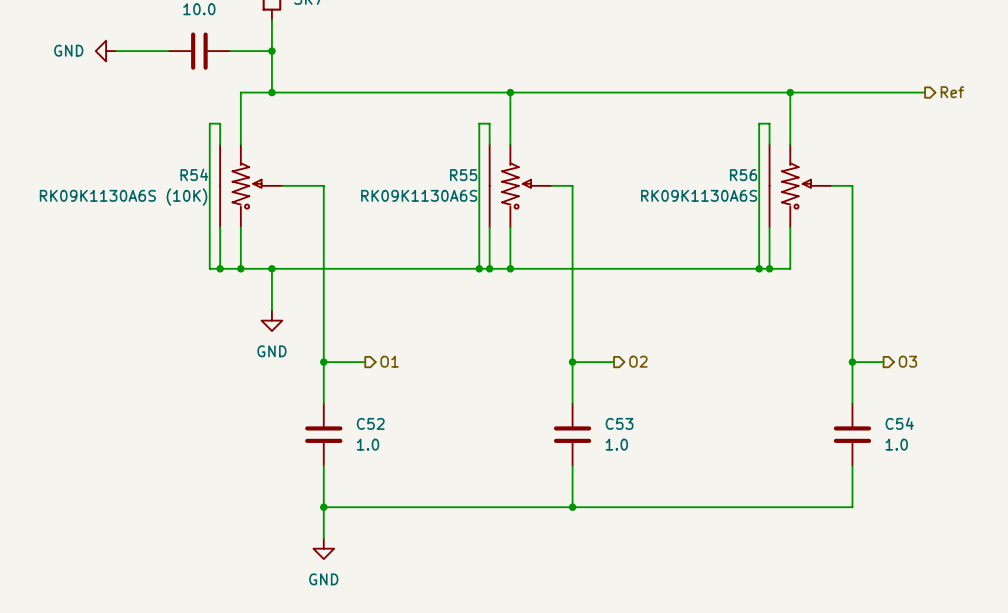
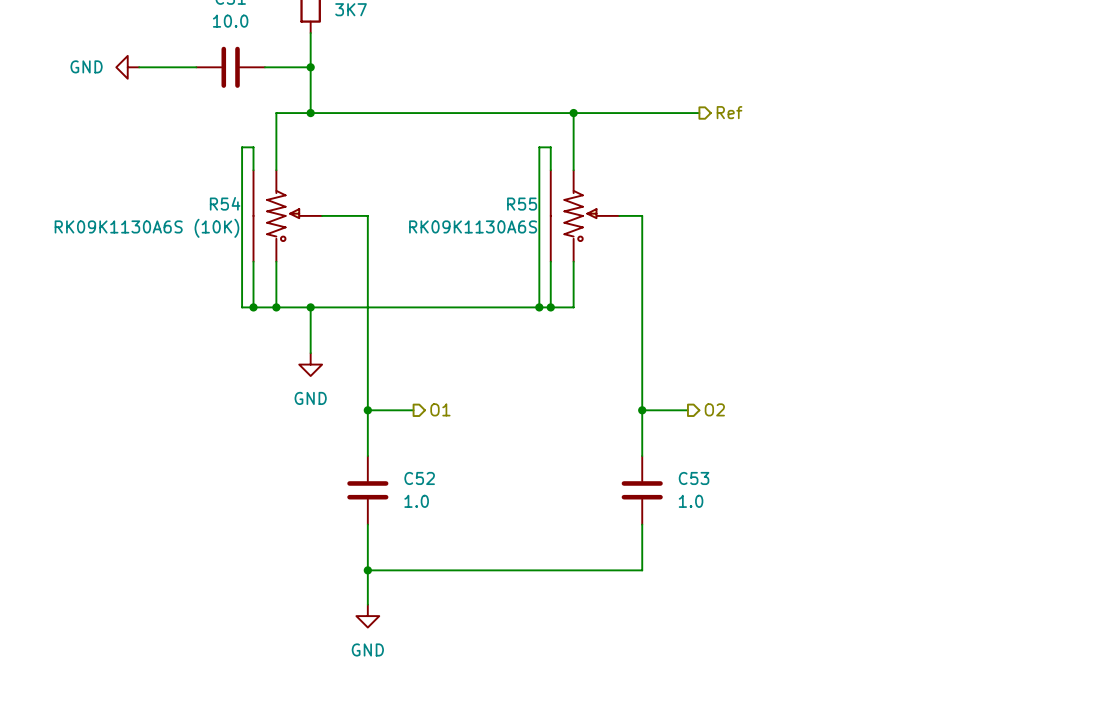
wire: (624, 92) (925, 92) -> none
hierarchical label: none -> Ref (729, 112)
wire: (790, 92) (790, 144) -> none
junction: (790, 92) -> none
hierarchical label: Ref (952, 92) -> none
wire: (769, 144) (769, 123) (759, 123) (759, 268) -> none
R56: RK09K1130A6S (800, 185) -> none
wire: (831, 185) (852, 185) (852, 403) -> none
wire: (769, 227) (769, 268) -> none
wire: (790, 227) (790, 268) (510, 268) -> none
junction: (510, 268) -> none
junction: (759, 268) -> none
junction: (769, 268) -> none
hierarchical label: O3 (907, 361) -> none
wire: (852, 362) (883, 362) -> none
junction: (852, 362) -> none
C54: 1.0 (852, 434) -> none
wire: (852, 465) (852, 507) (572, 507) -> none
junction: (572, 507) -> none

